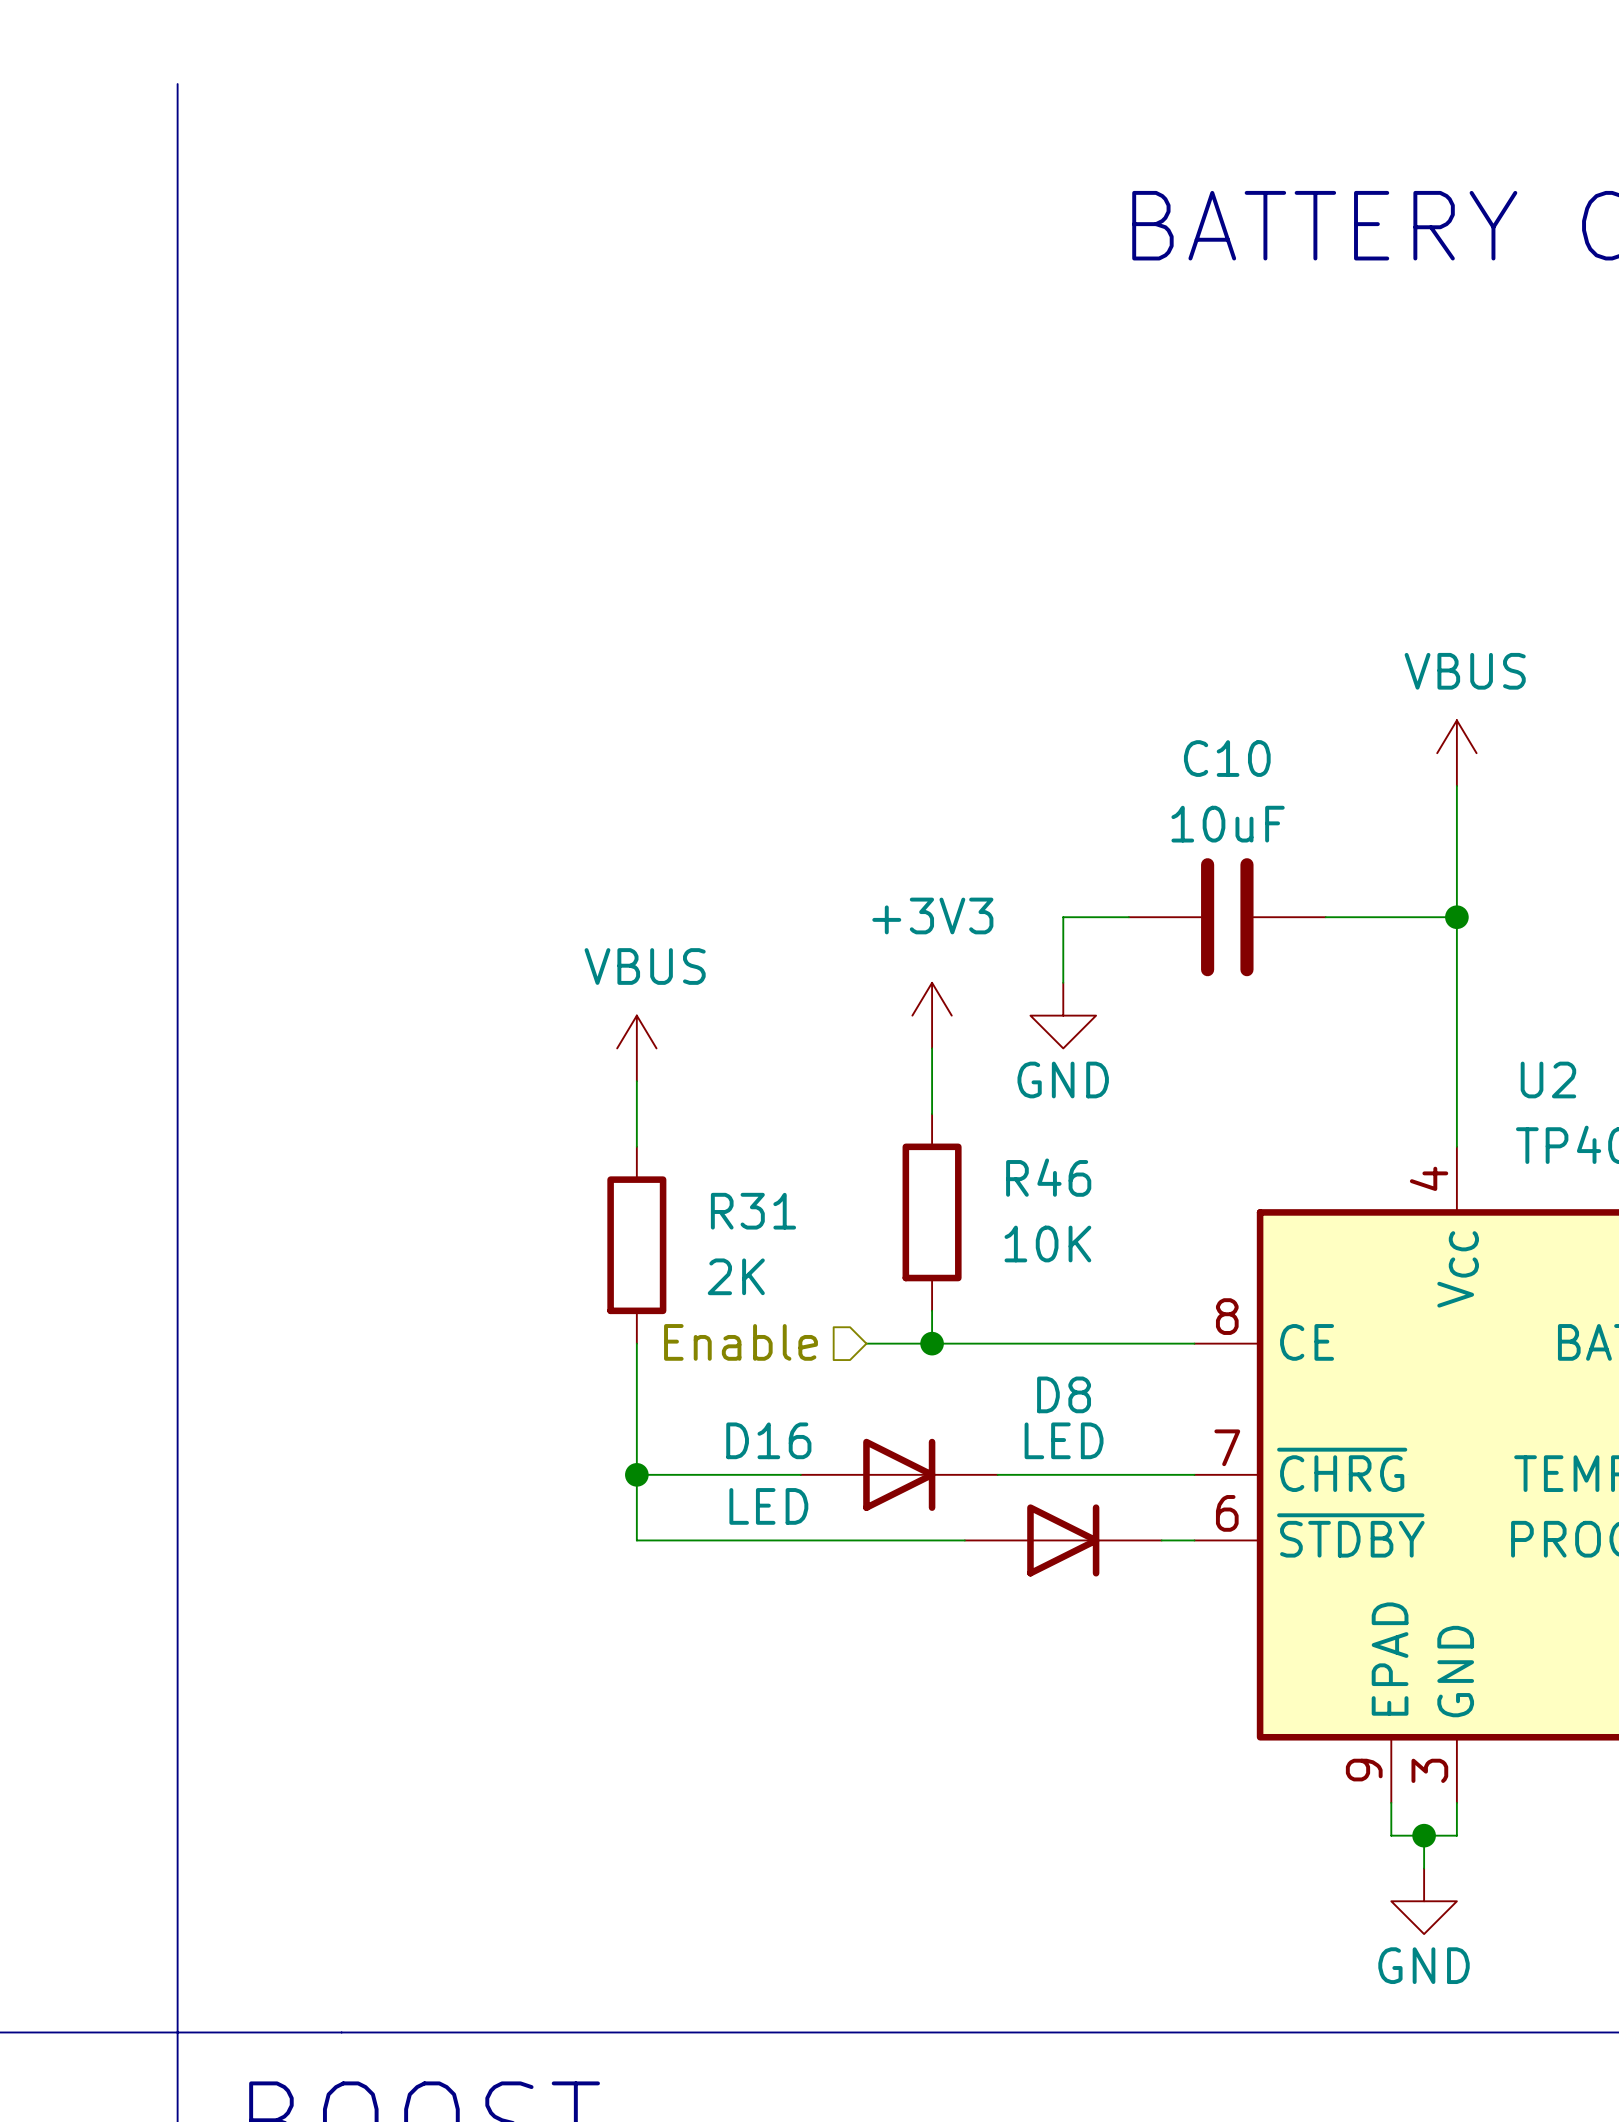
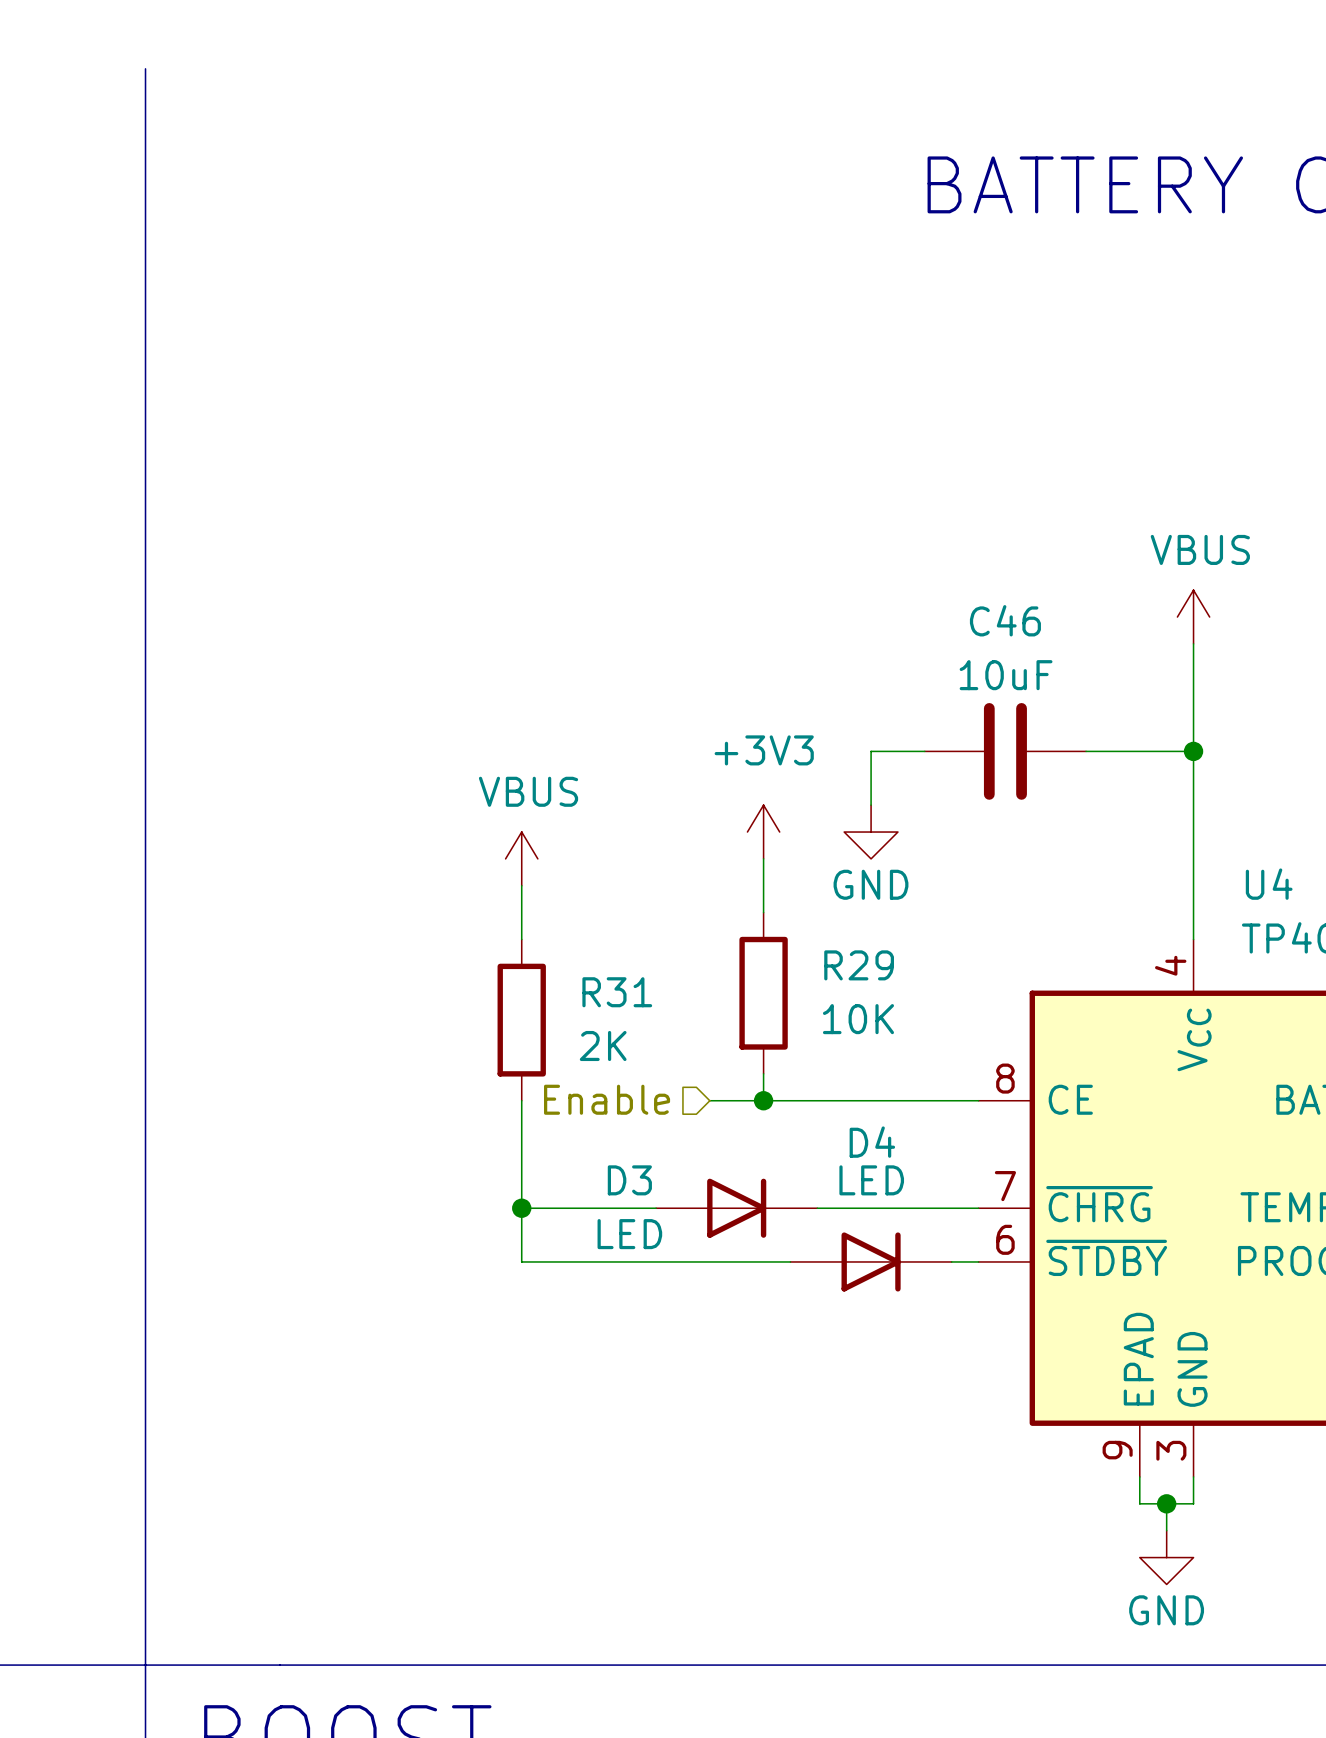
C10 name: C10 (1227, 758) -> C46 (1005, 620)
U2 name: U2 (1548, 1079) -> U4 (1269, 884)
R46 name: R46 (1048, 1177) -> R29 (859, 965)
D8 name: D8 (1064, 1394) -> D4 (872, 1142)
D16 name: D16 (768, 1440) -> D3 (629, 1180)

